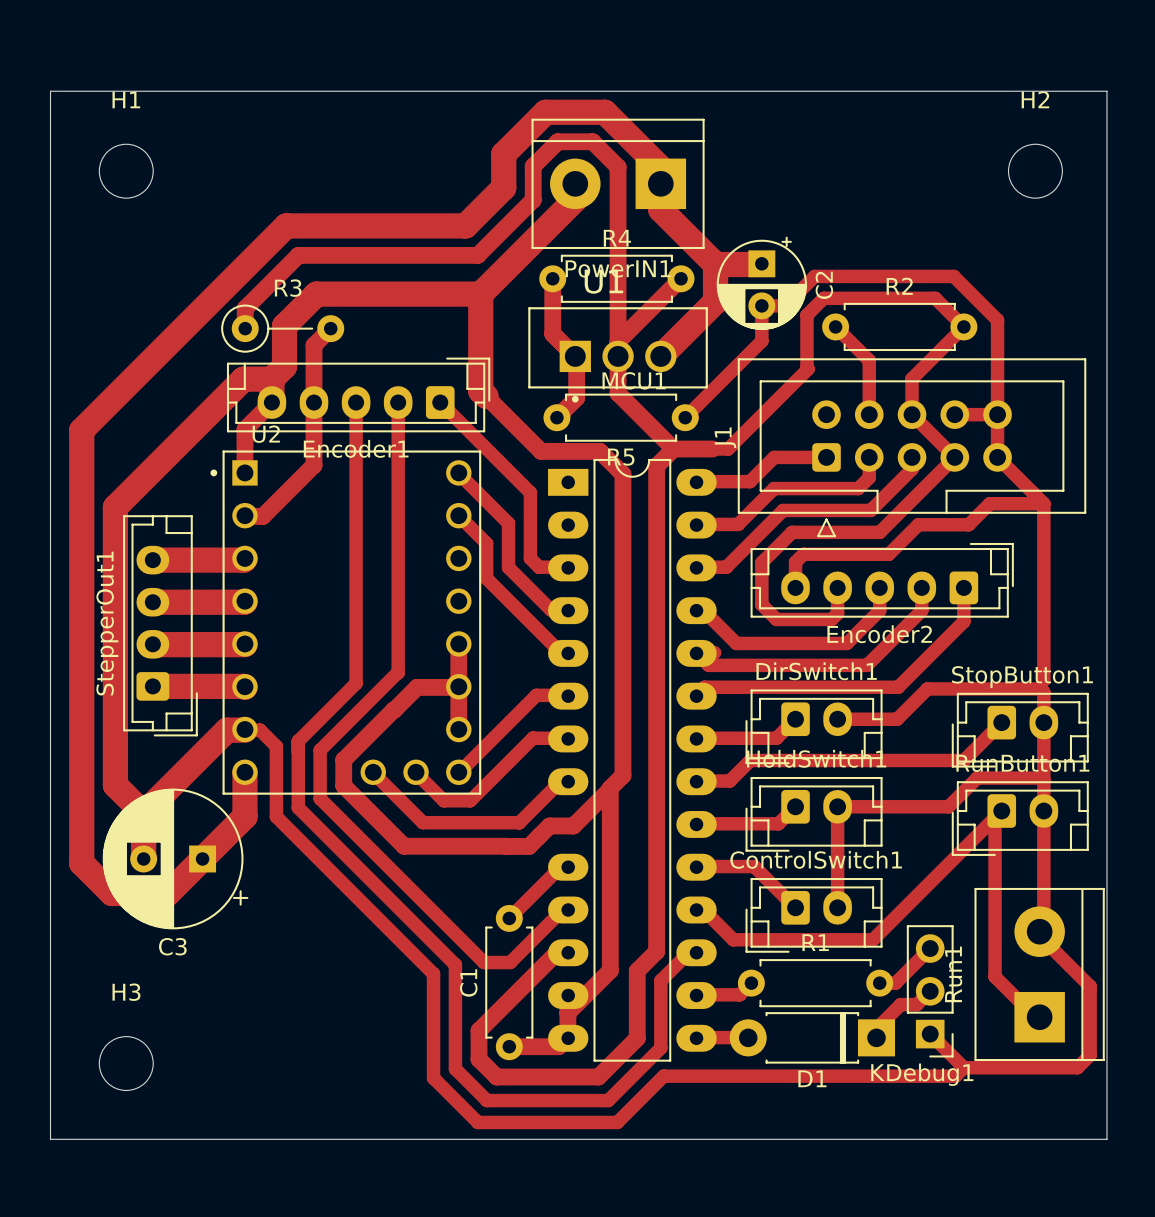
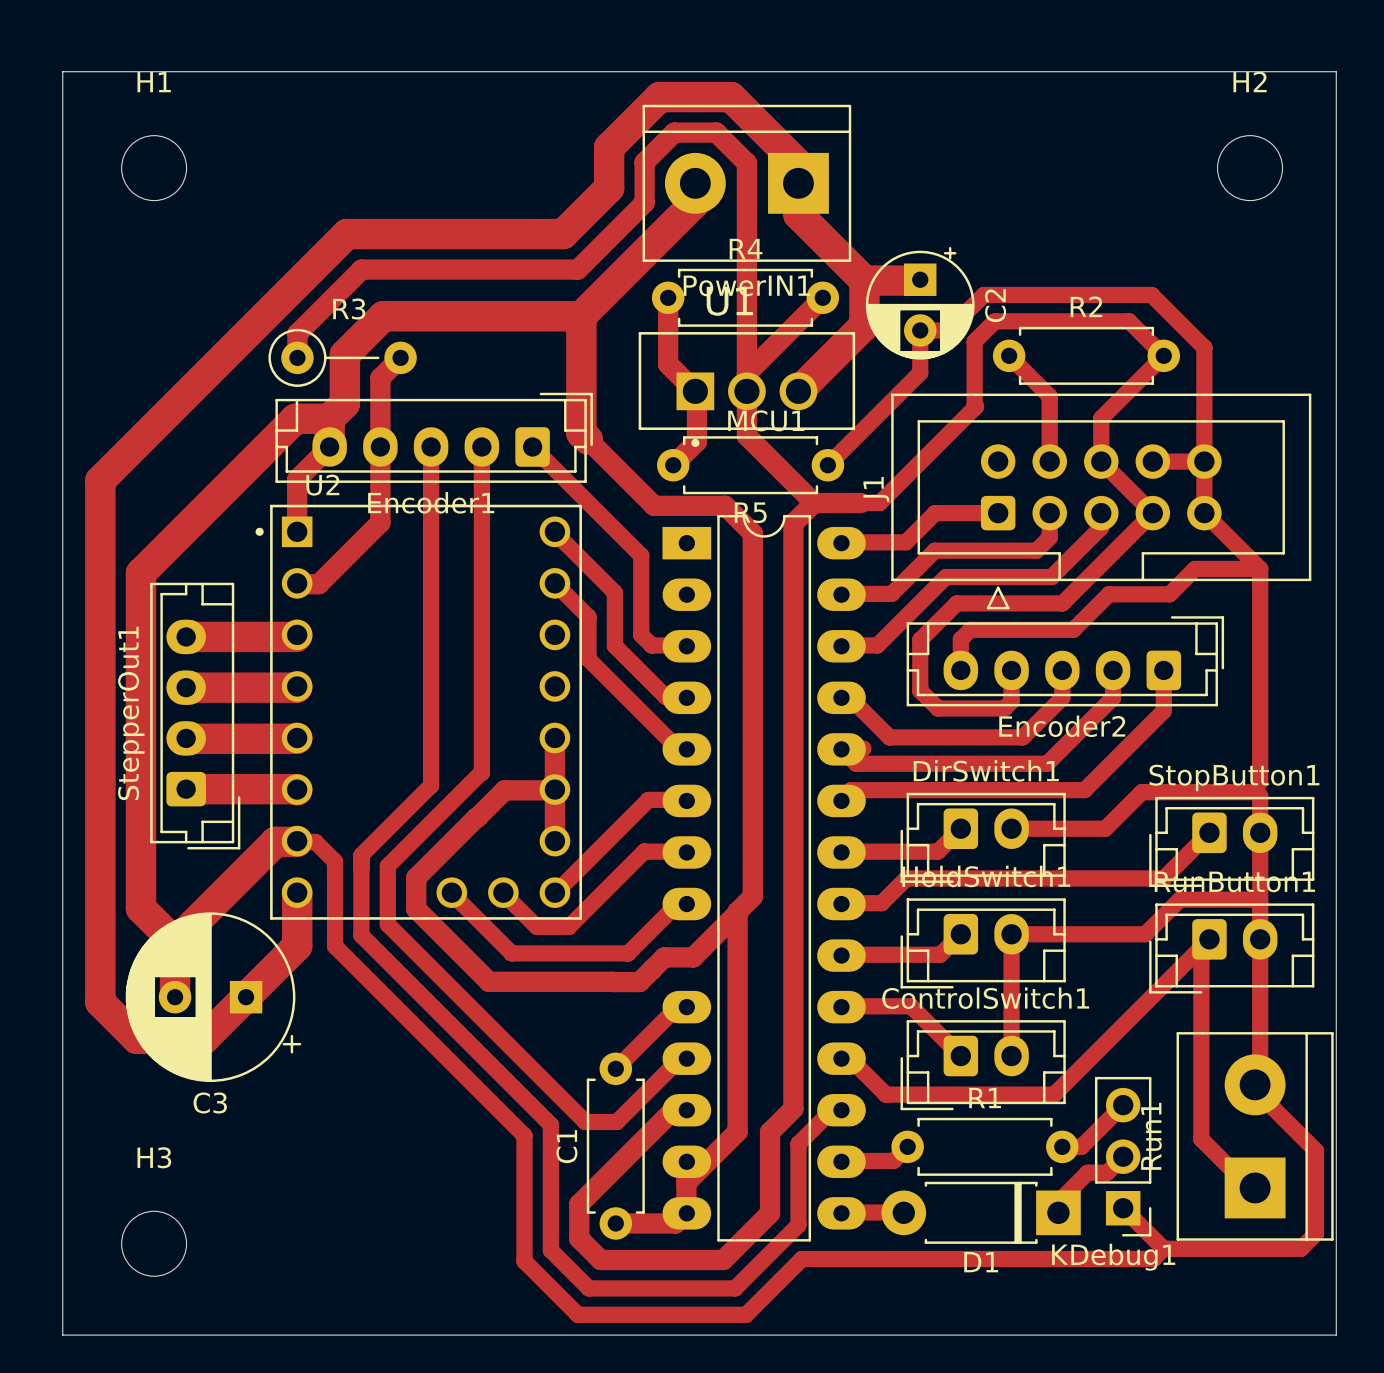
track: (945, 688) (927, 688) (897, 719) -> (1141, 792) (1105, 828) (1083, 828)

